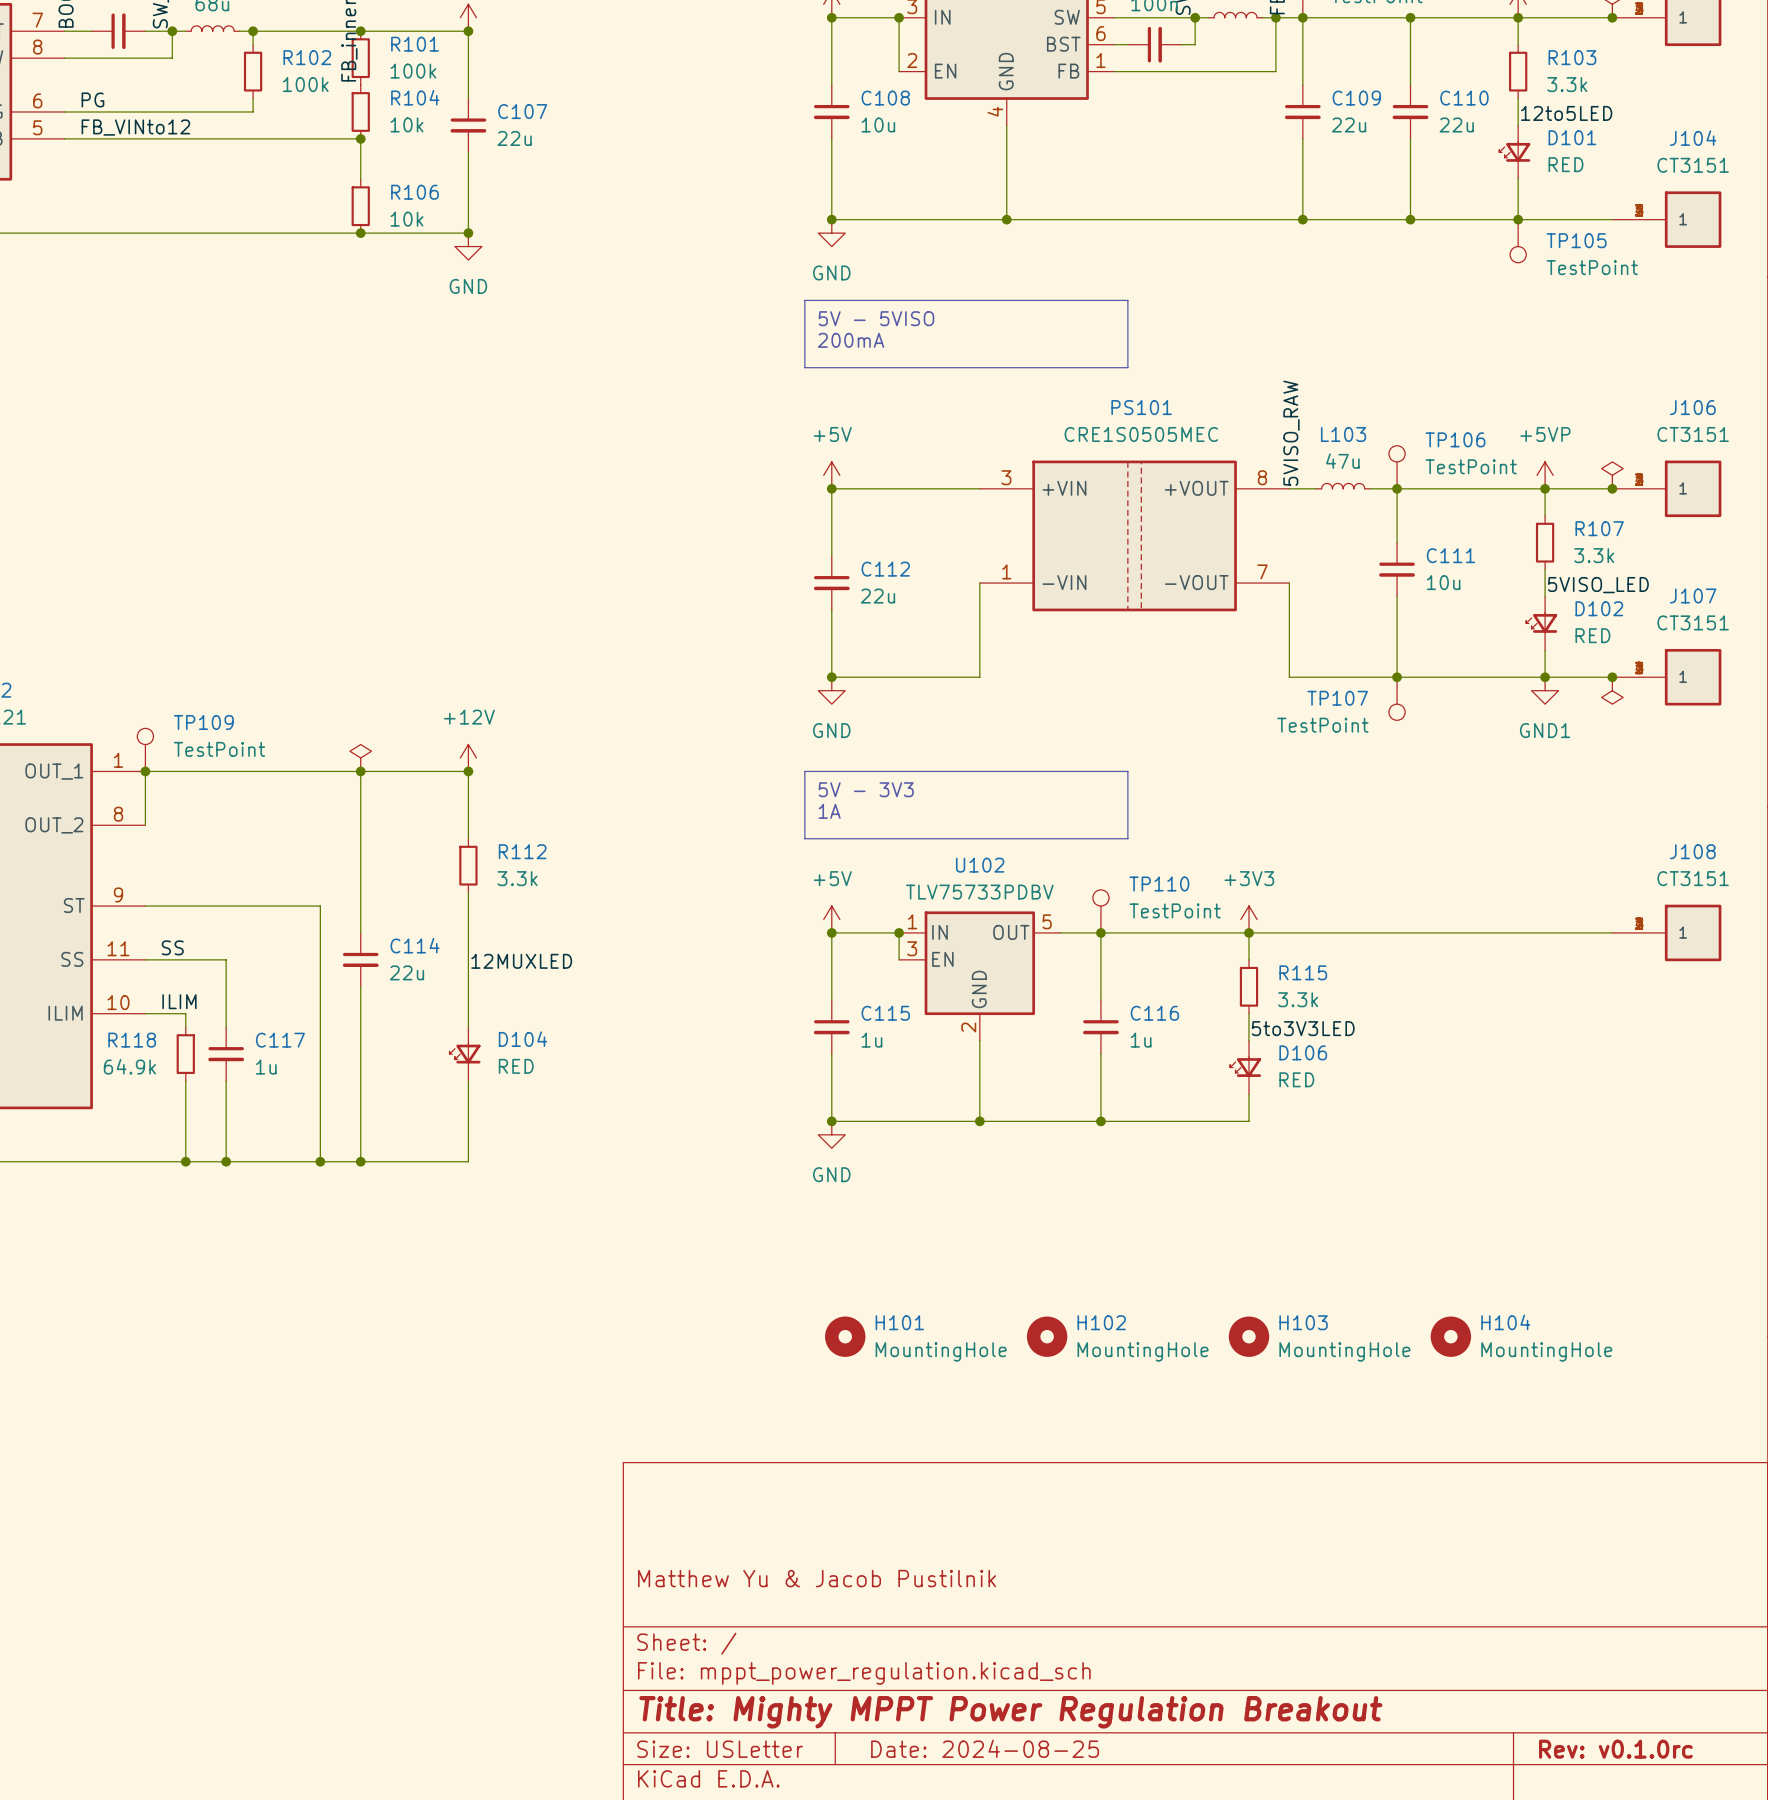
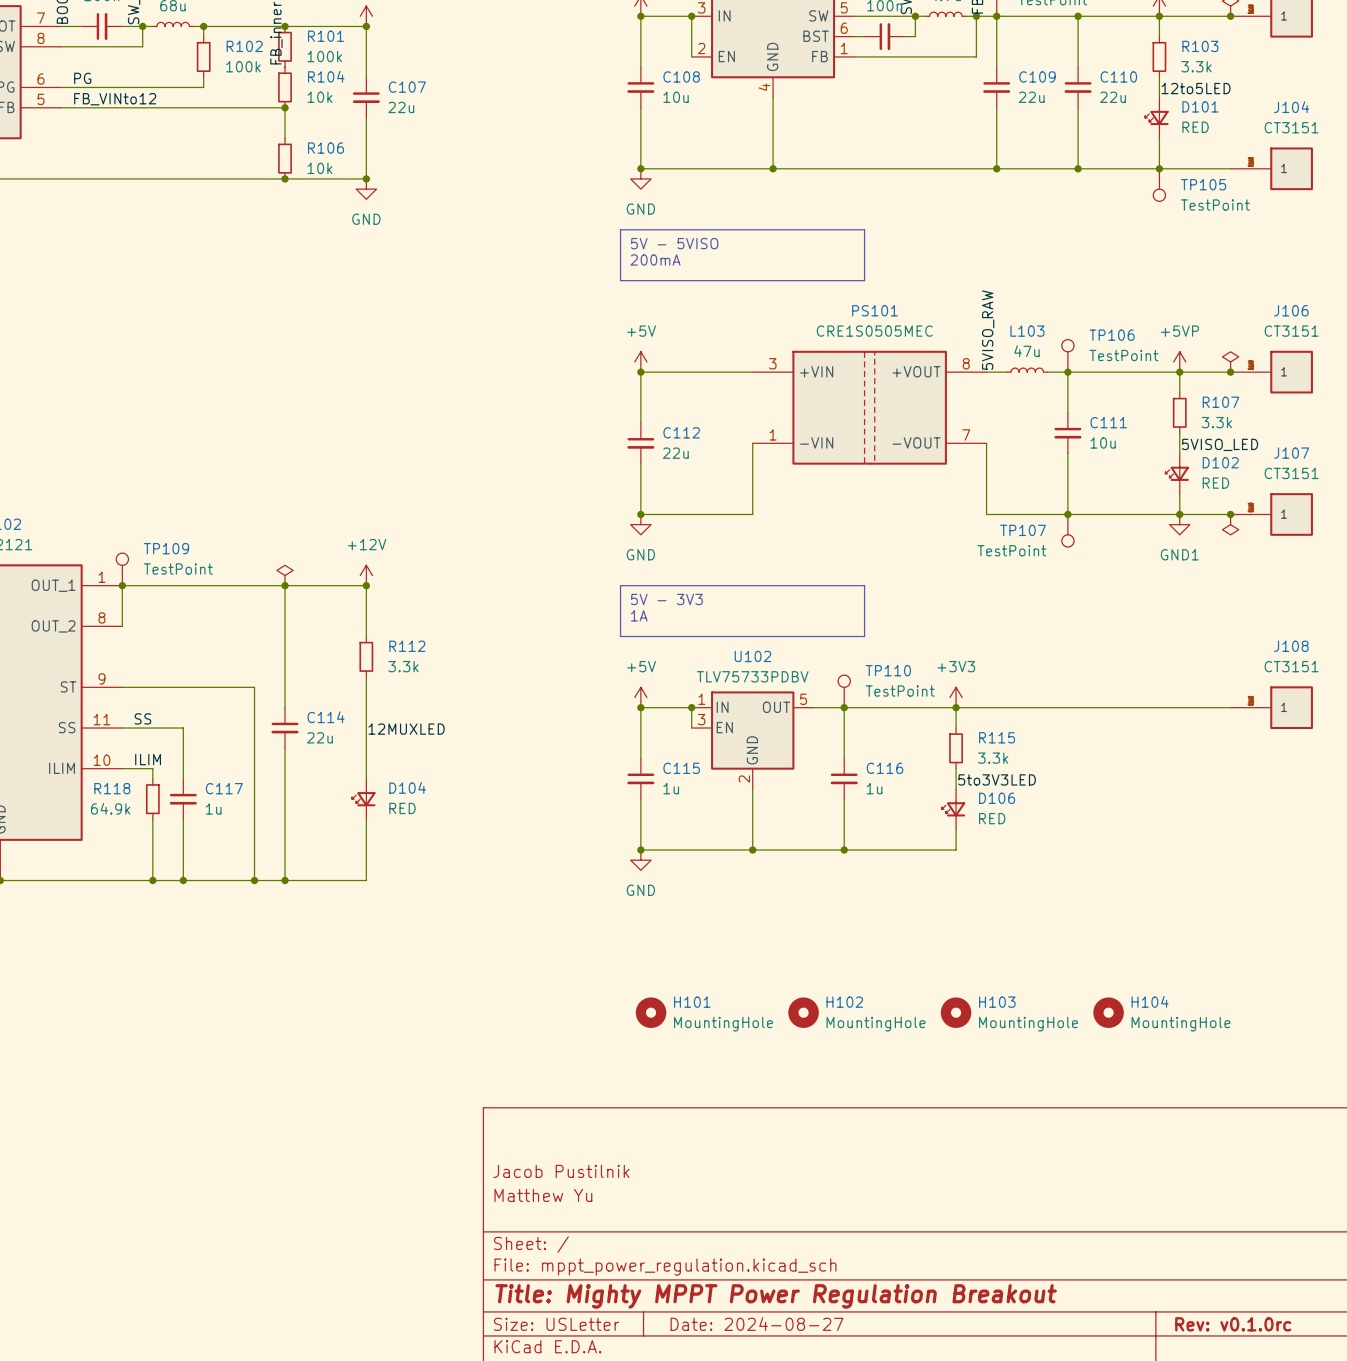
title block: none -> Jacob Pustilnik (561, 1171)
title block: Matthew Yu & Jacob Pustilnik (817, 1578) -> Matthew Yu (543, 1195)
title block: Date: 2024-08-25 (985, 1748) -> Date: 2024-08-27 (756, 1324)

